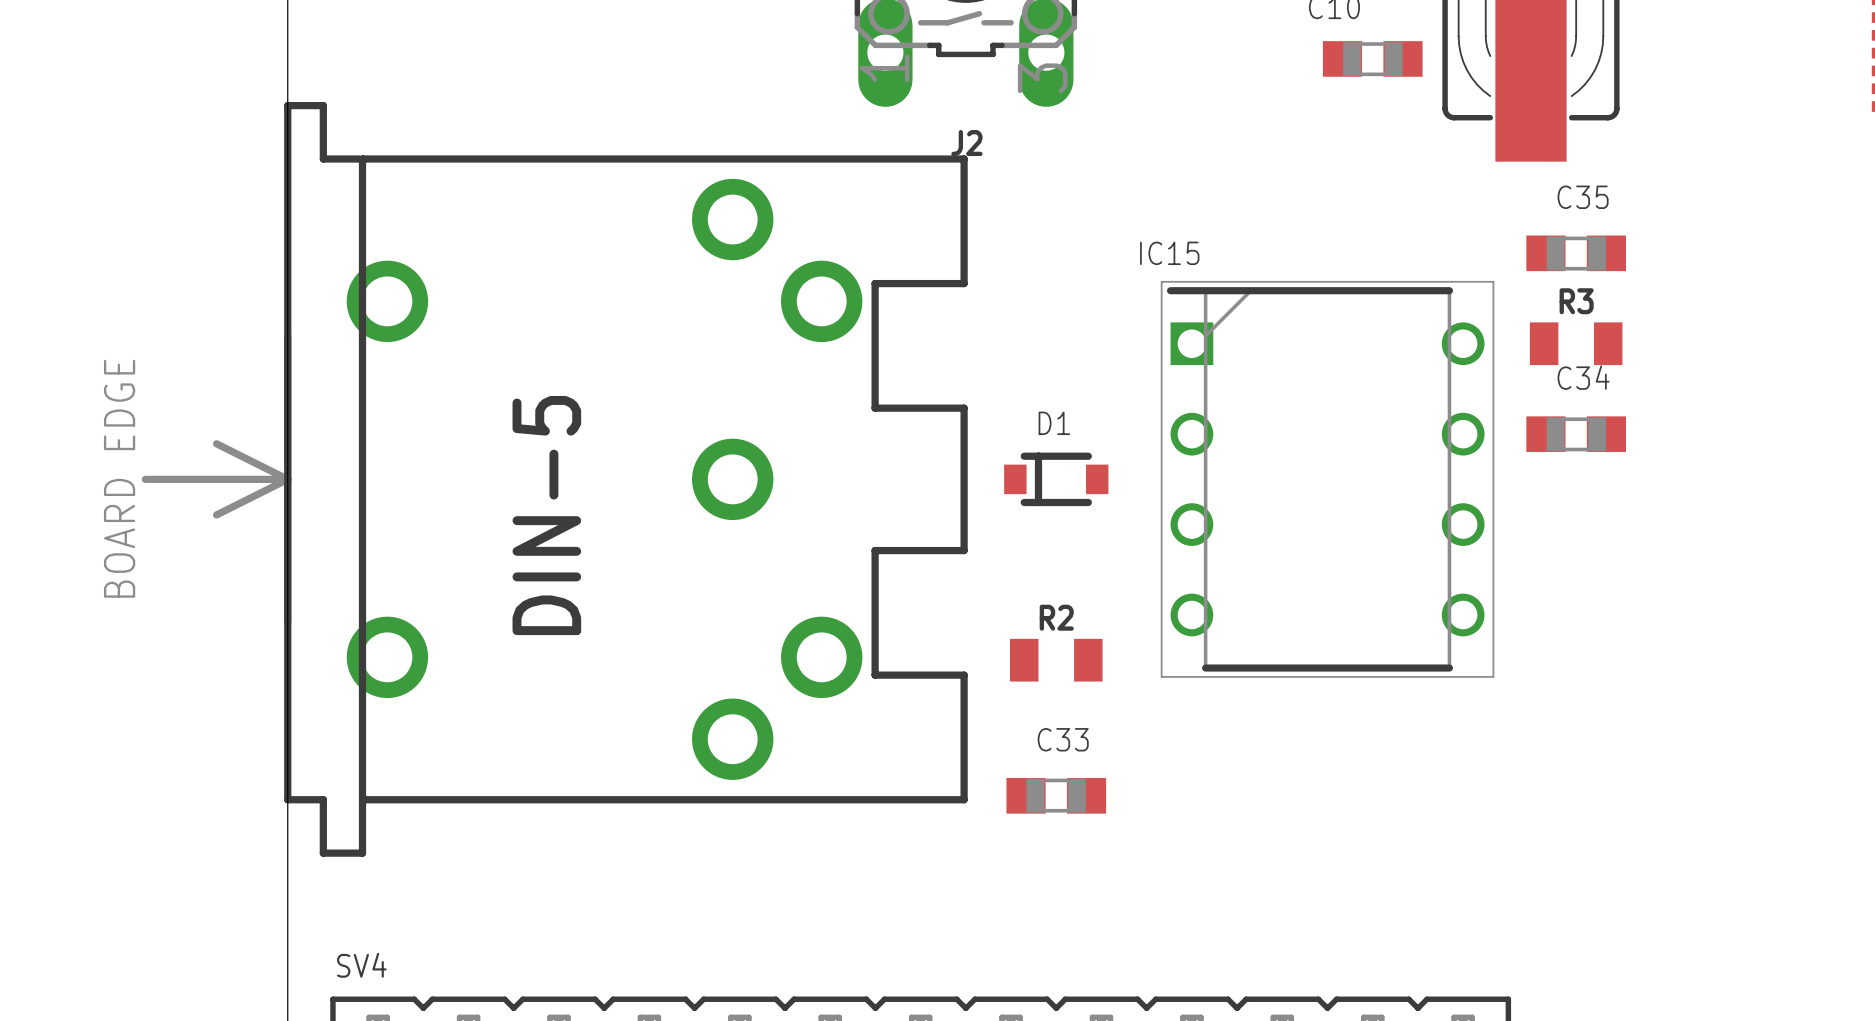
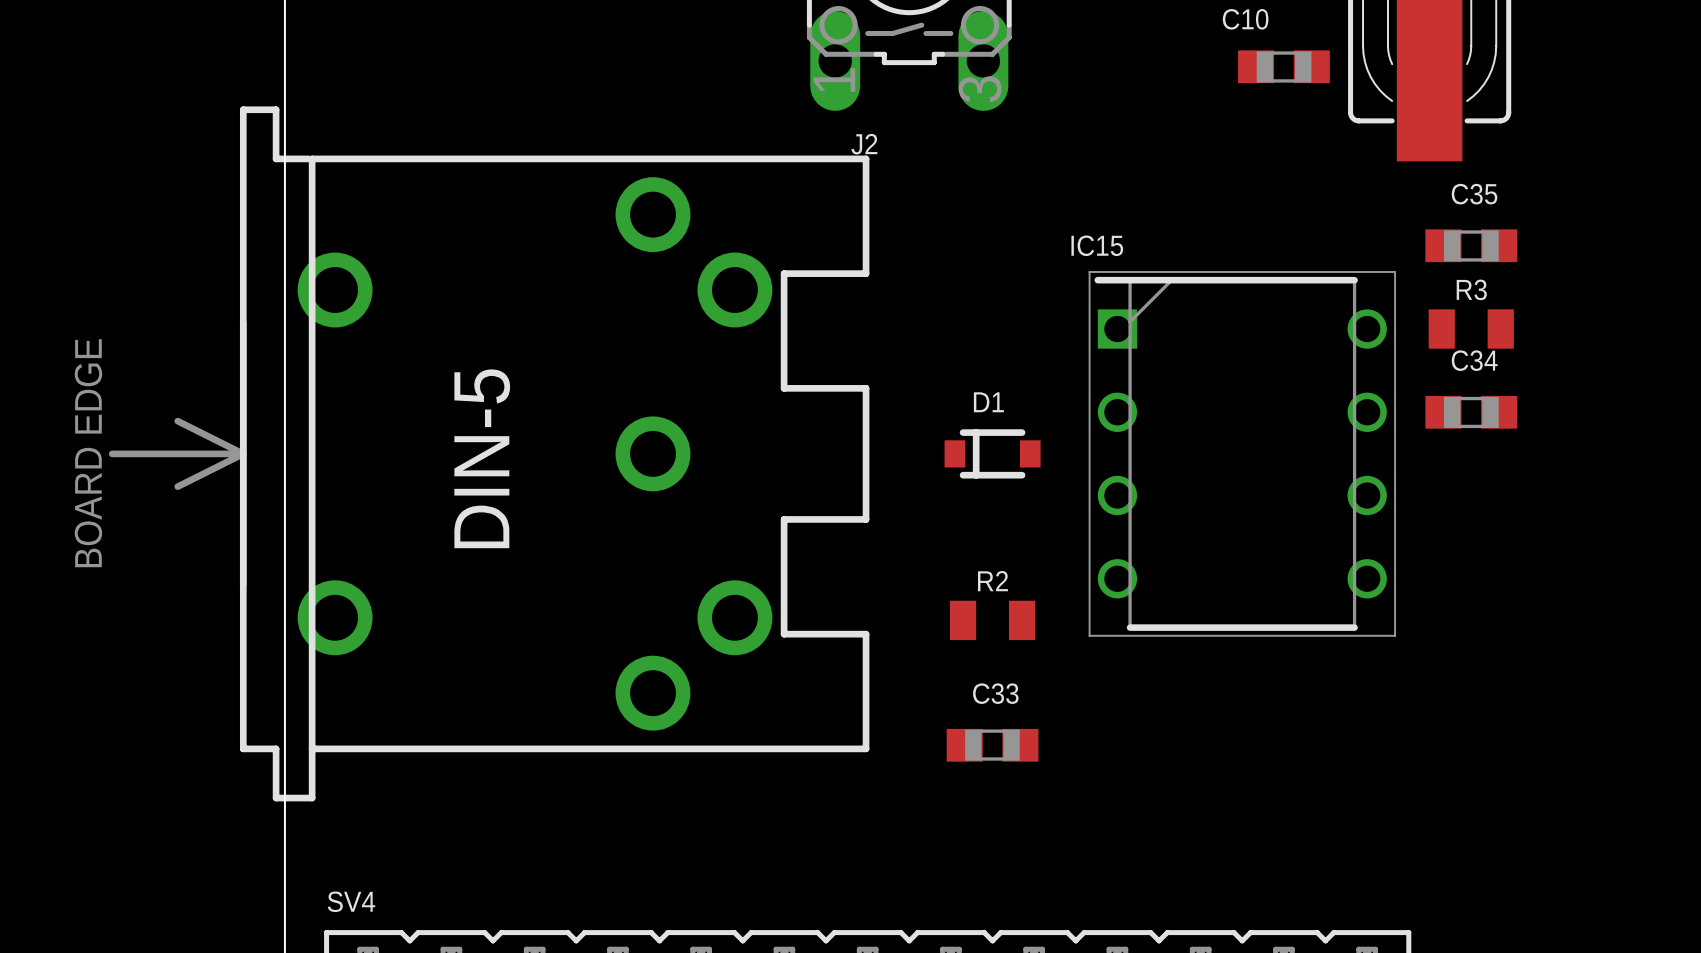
J2 position: (554, 479) -> (489, 453)

